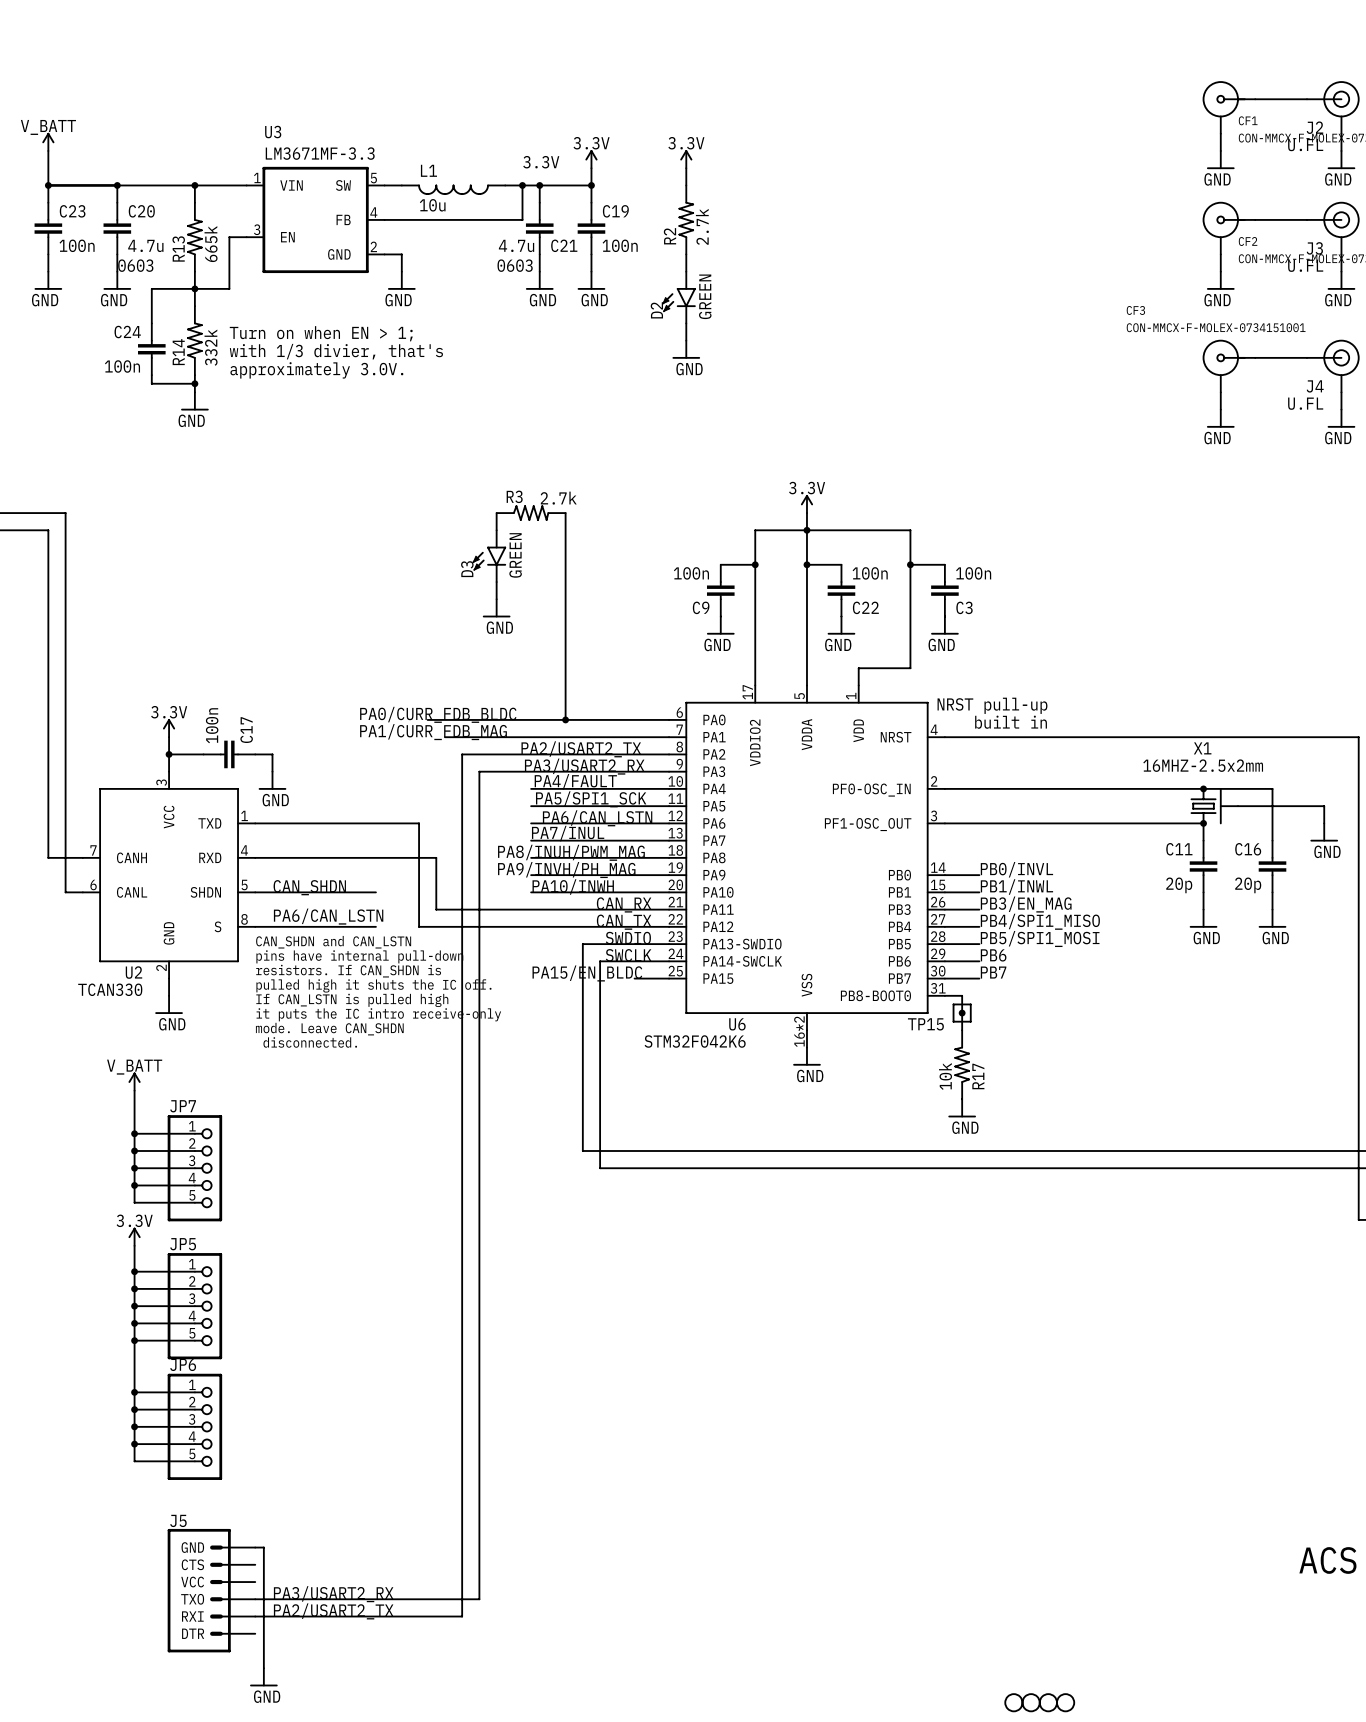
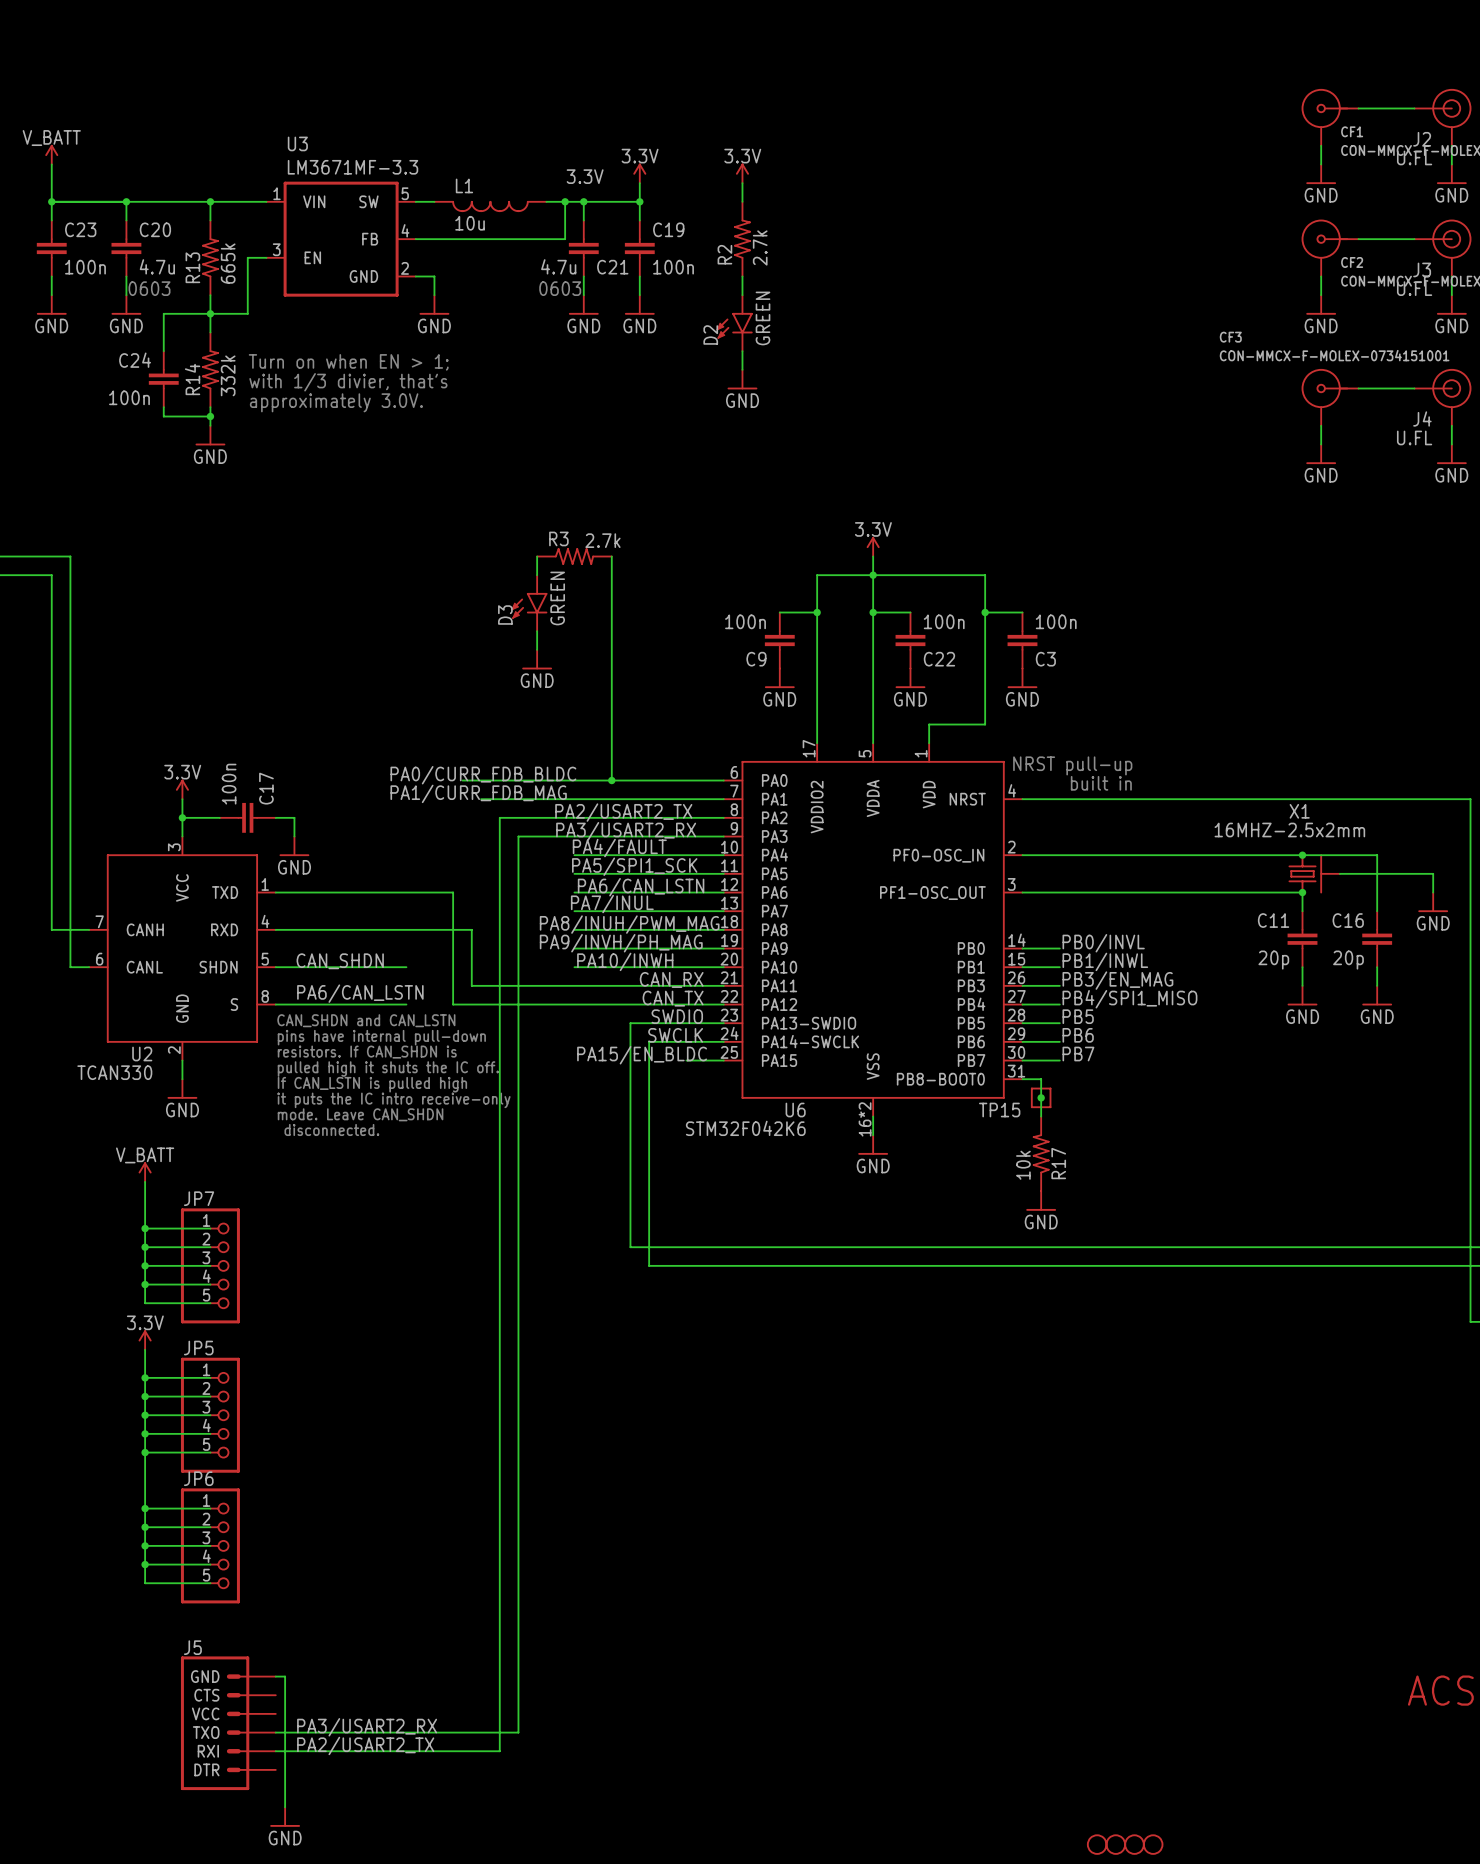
label: PB5/SPI1_MOSI (1040, 938) -> PB5 (1078, 1016)

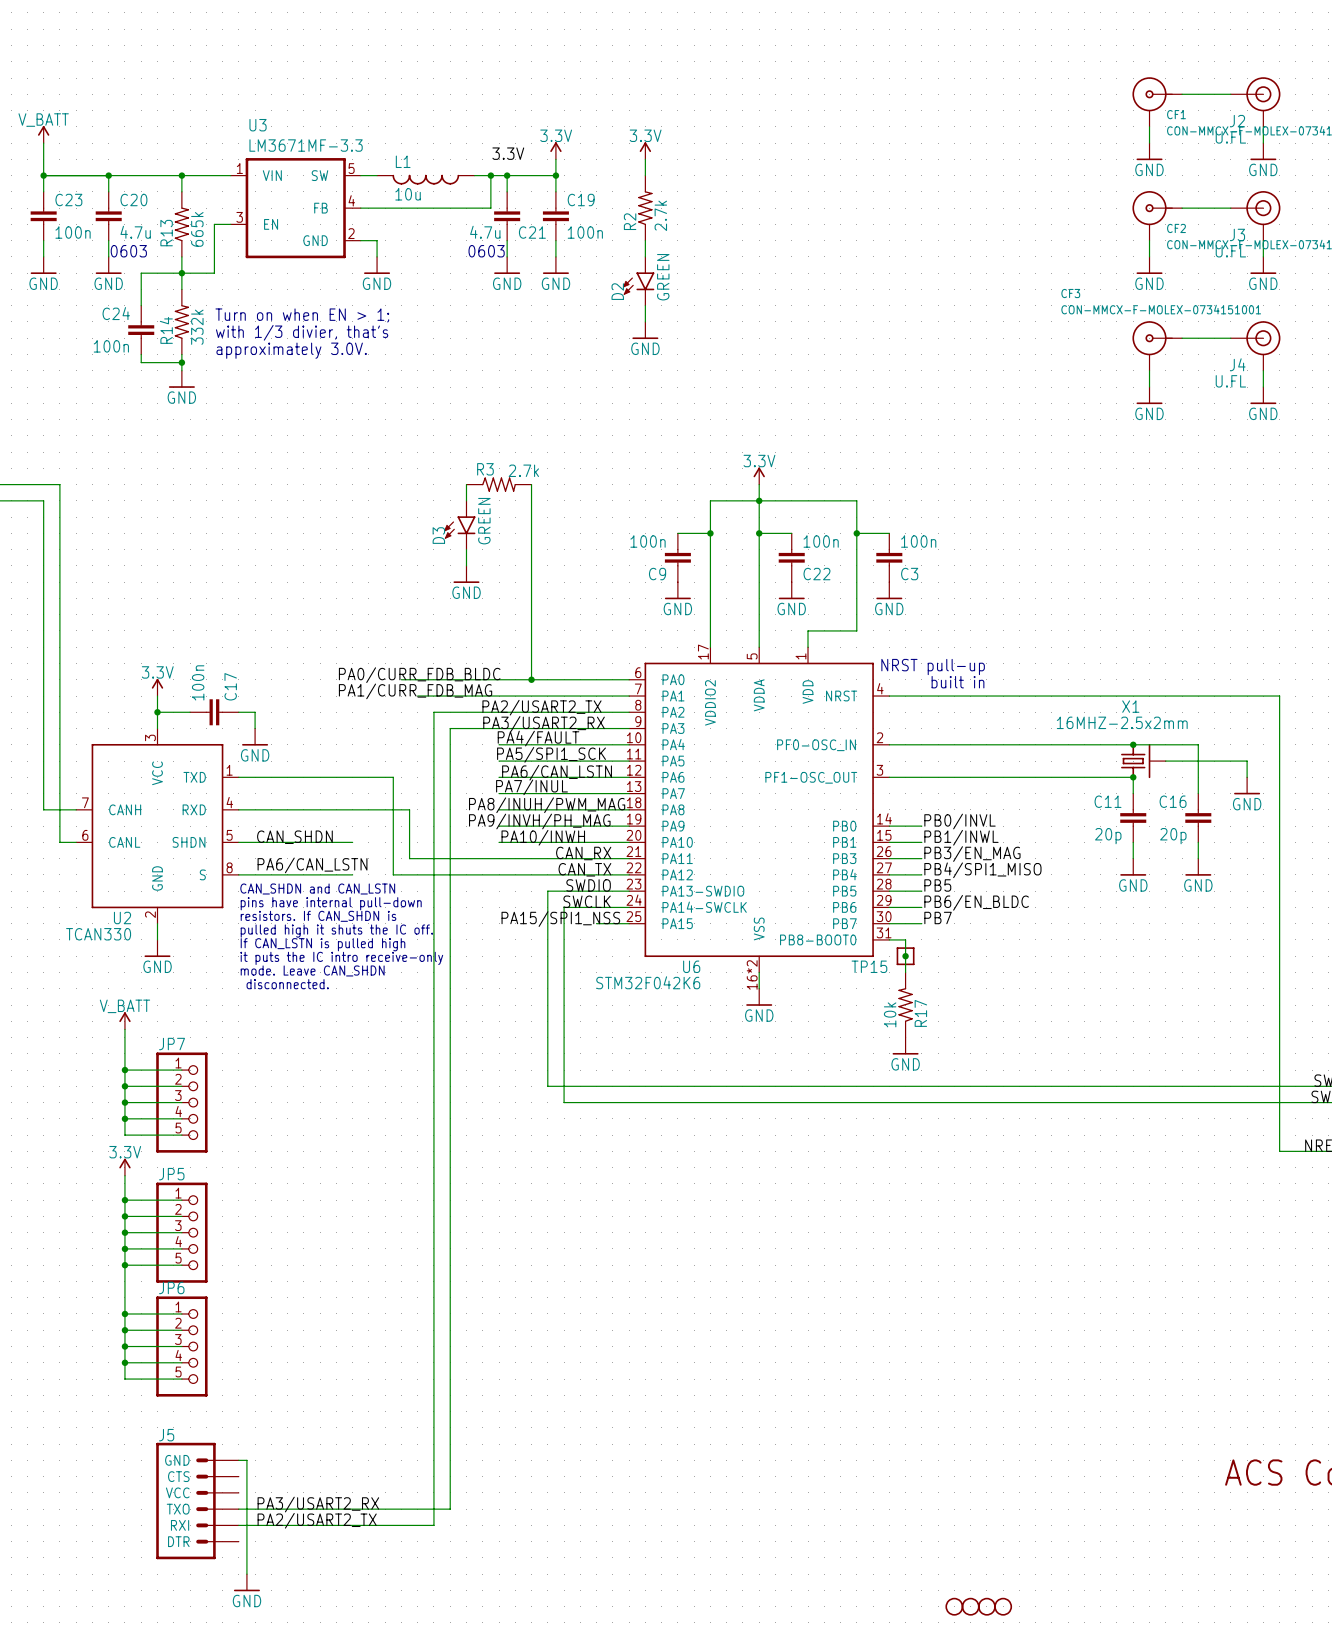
label: PB6 (1078, 1035) -> PB6/EN_BLDC (976, 902)
label: PA15/EN_BLDC (642, 1055) -> PA15/SPI1_NSS (560, 919)

